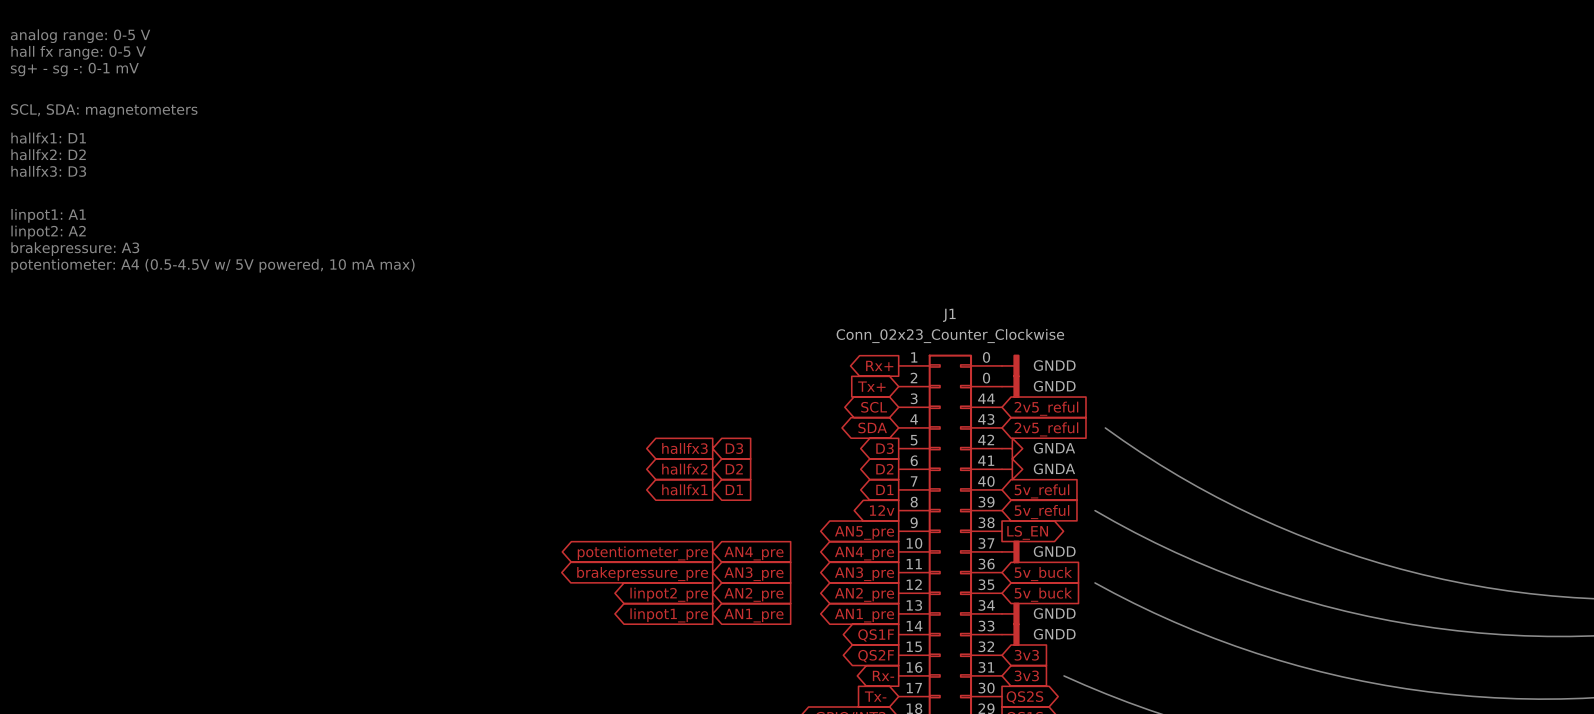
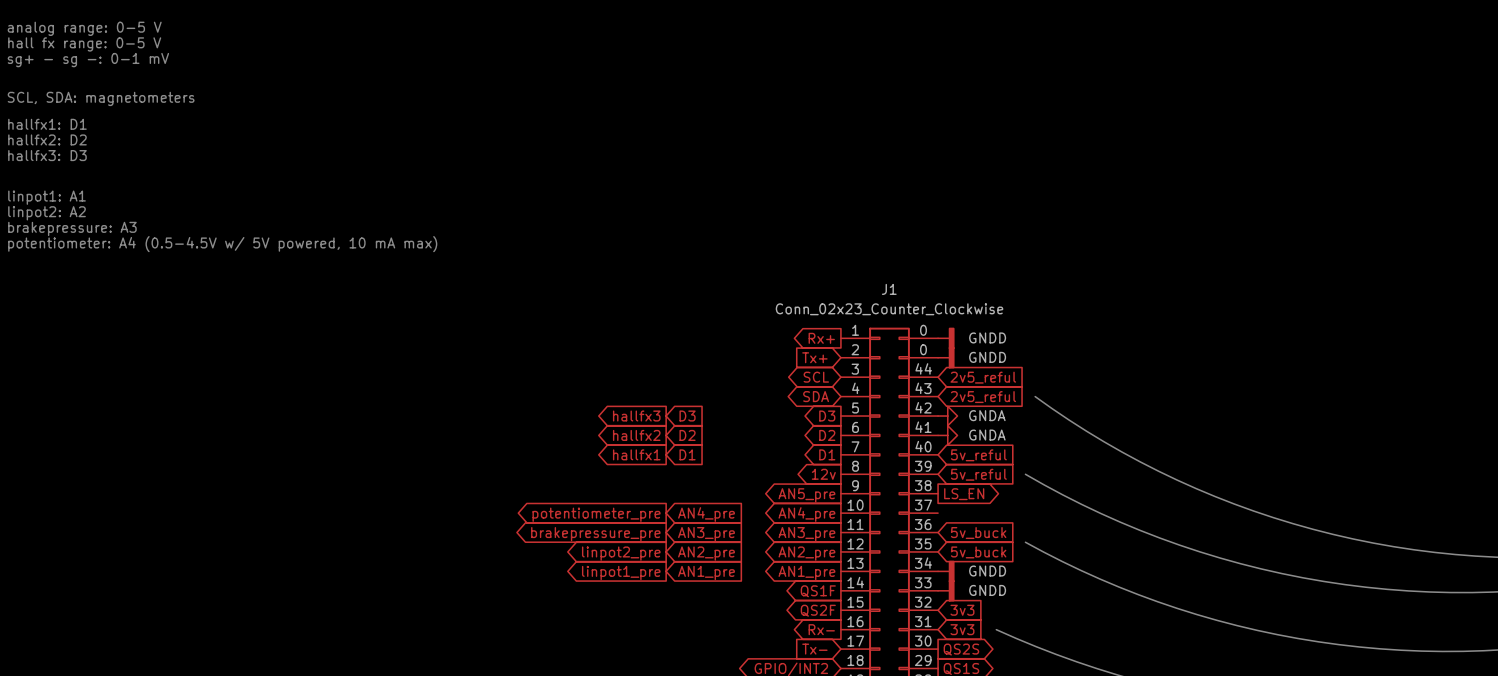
power symbol: GNDD (1010, 551) -> none

